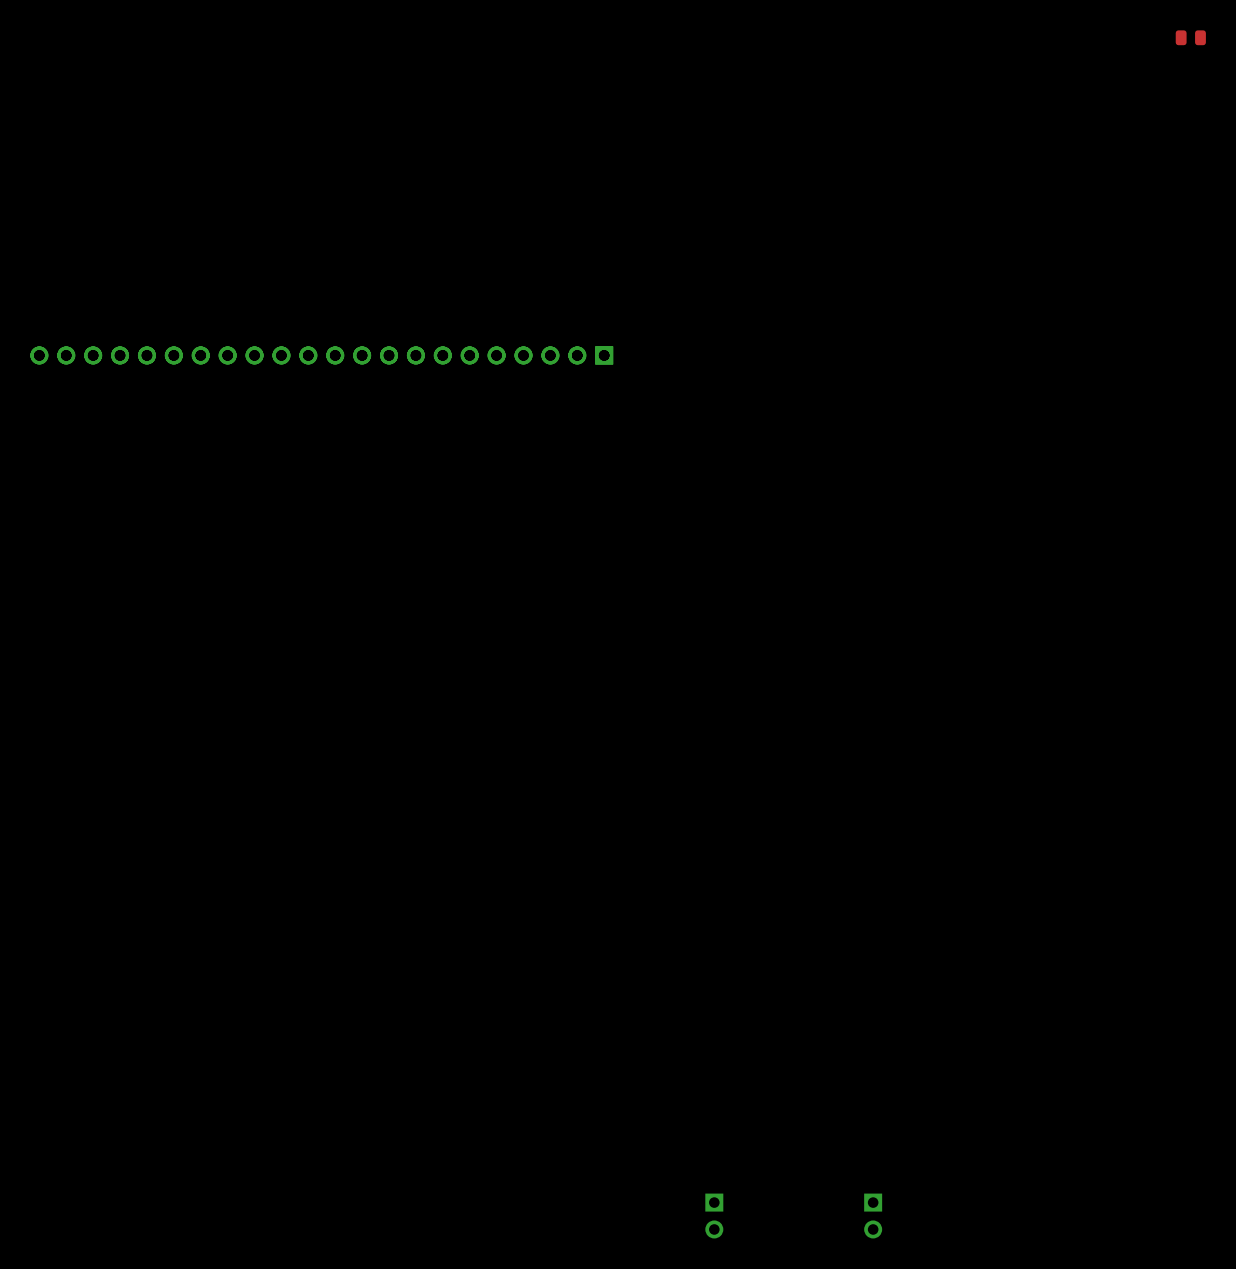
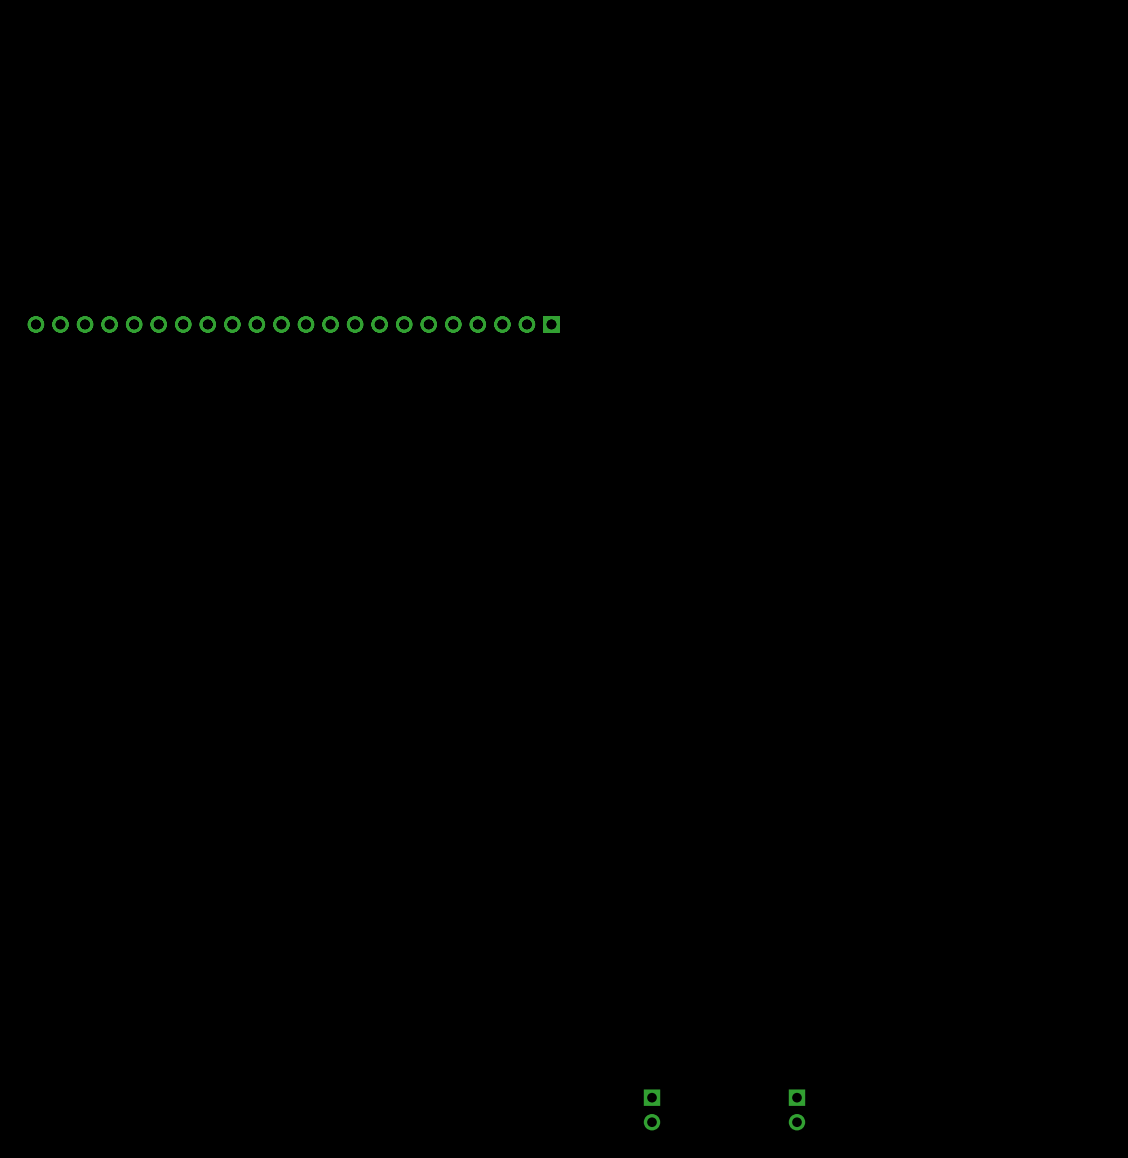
part: (1190, 37) -> none

